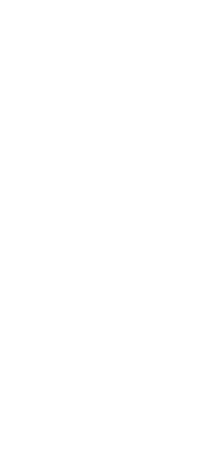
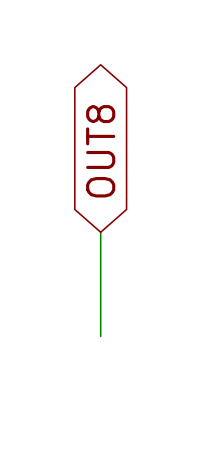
global label: none -> OUT8 (100, 151)
wire: none -> (100, 232) (100, 336)

